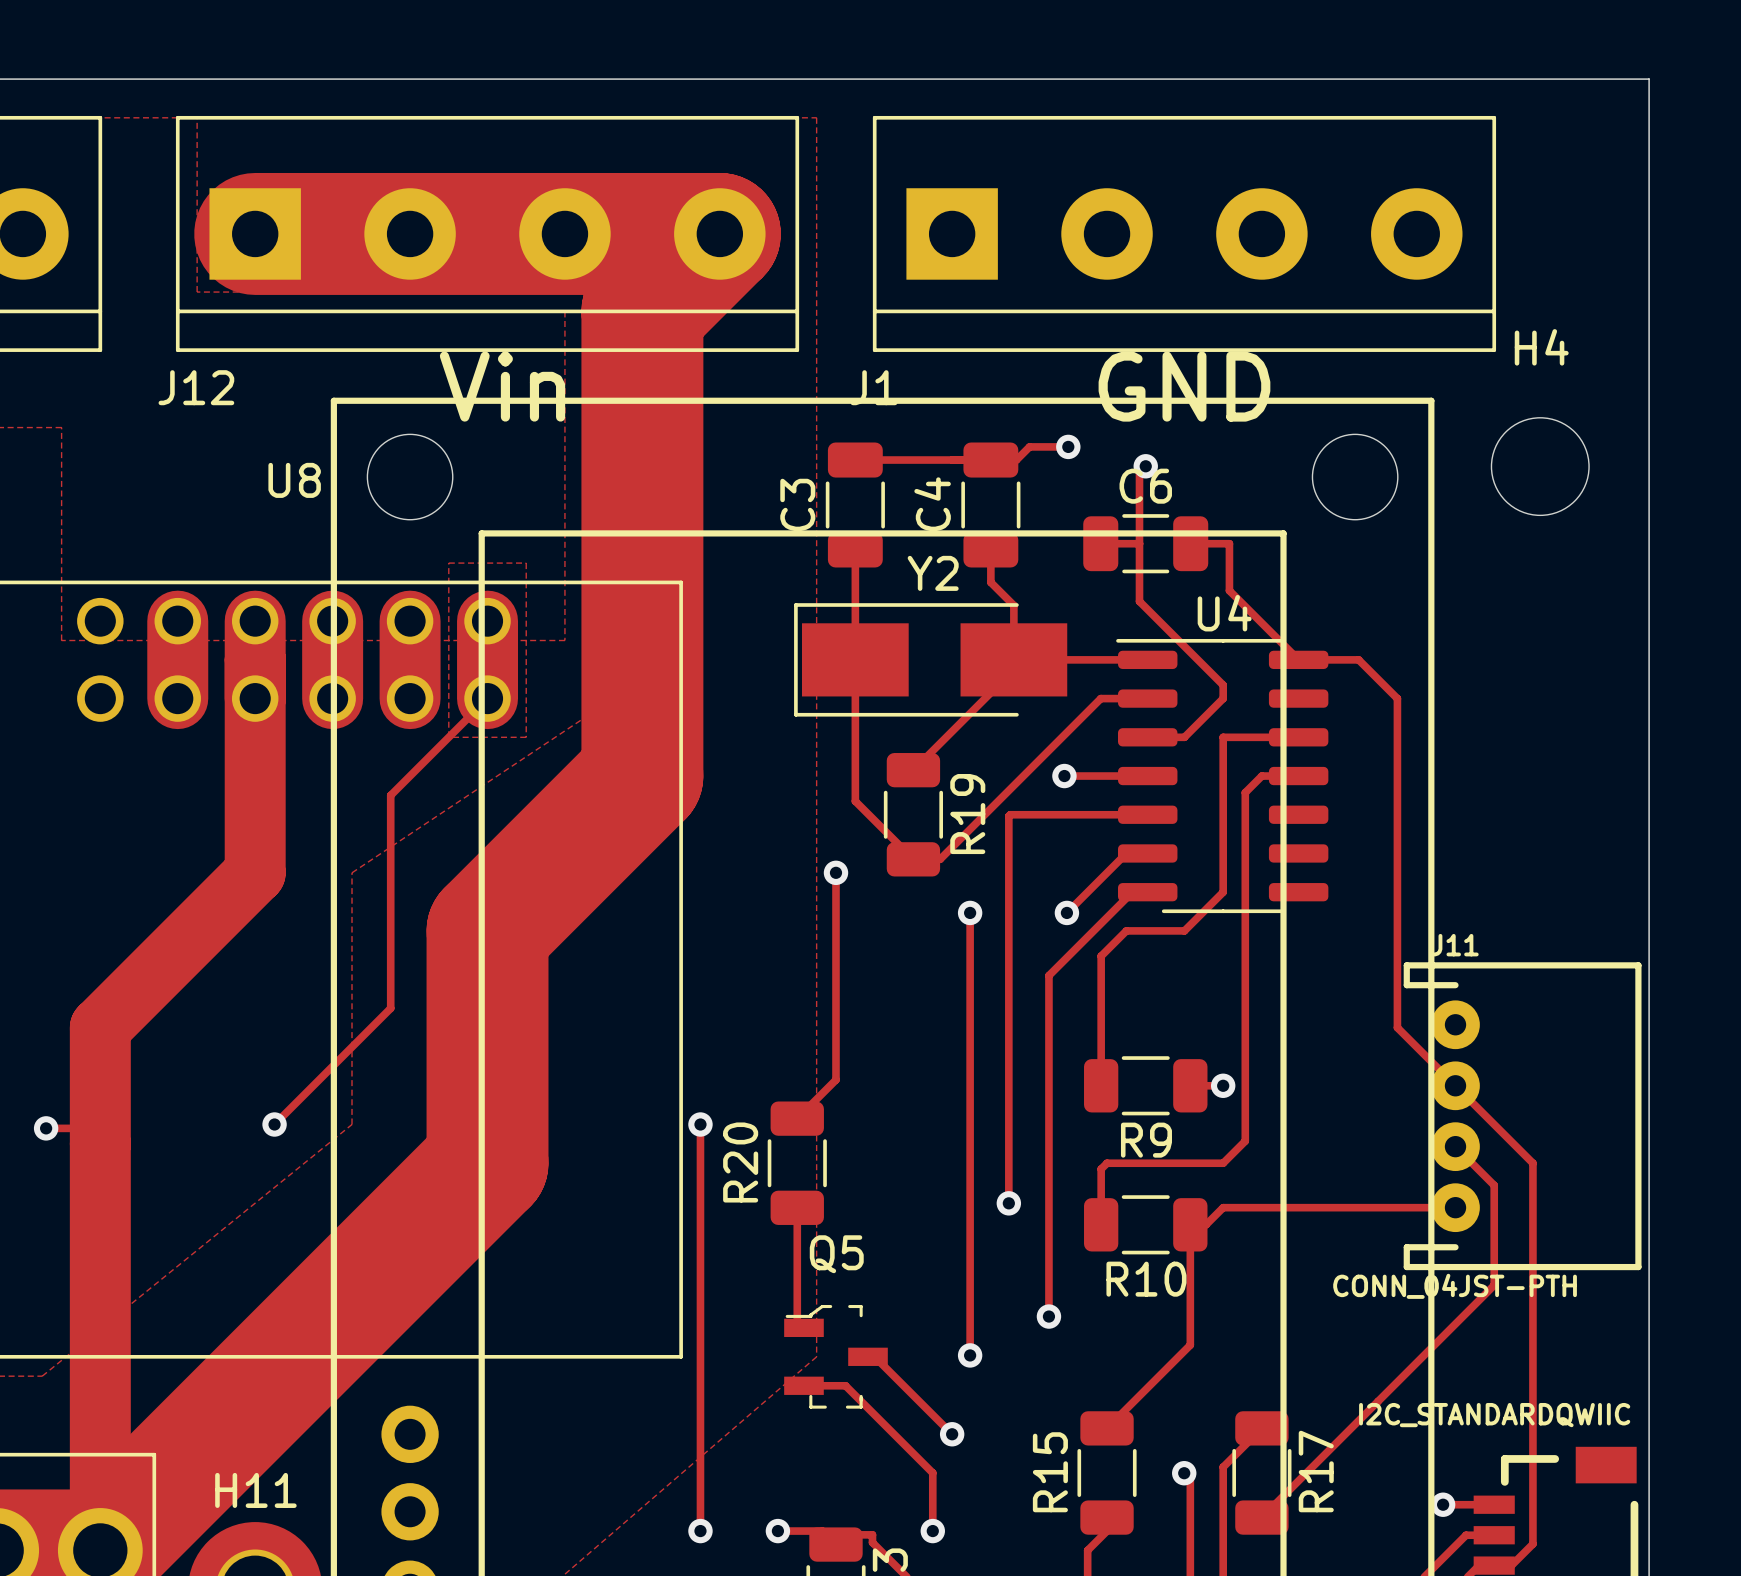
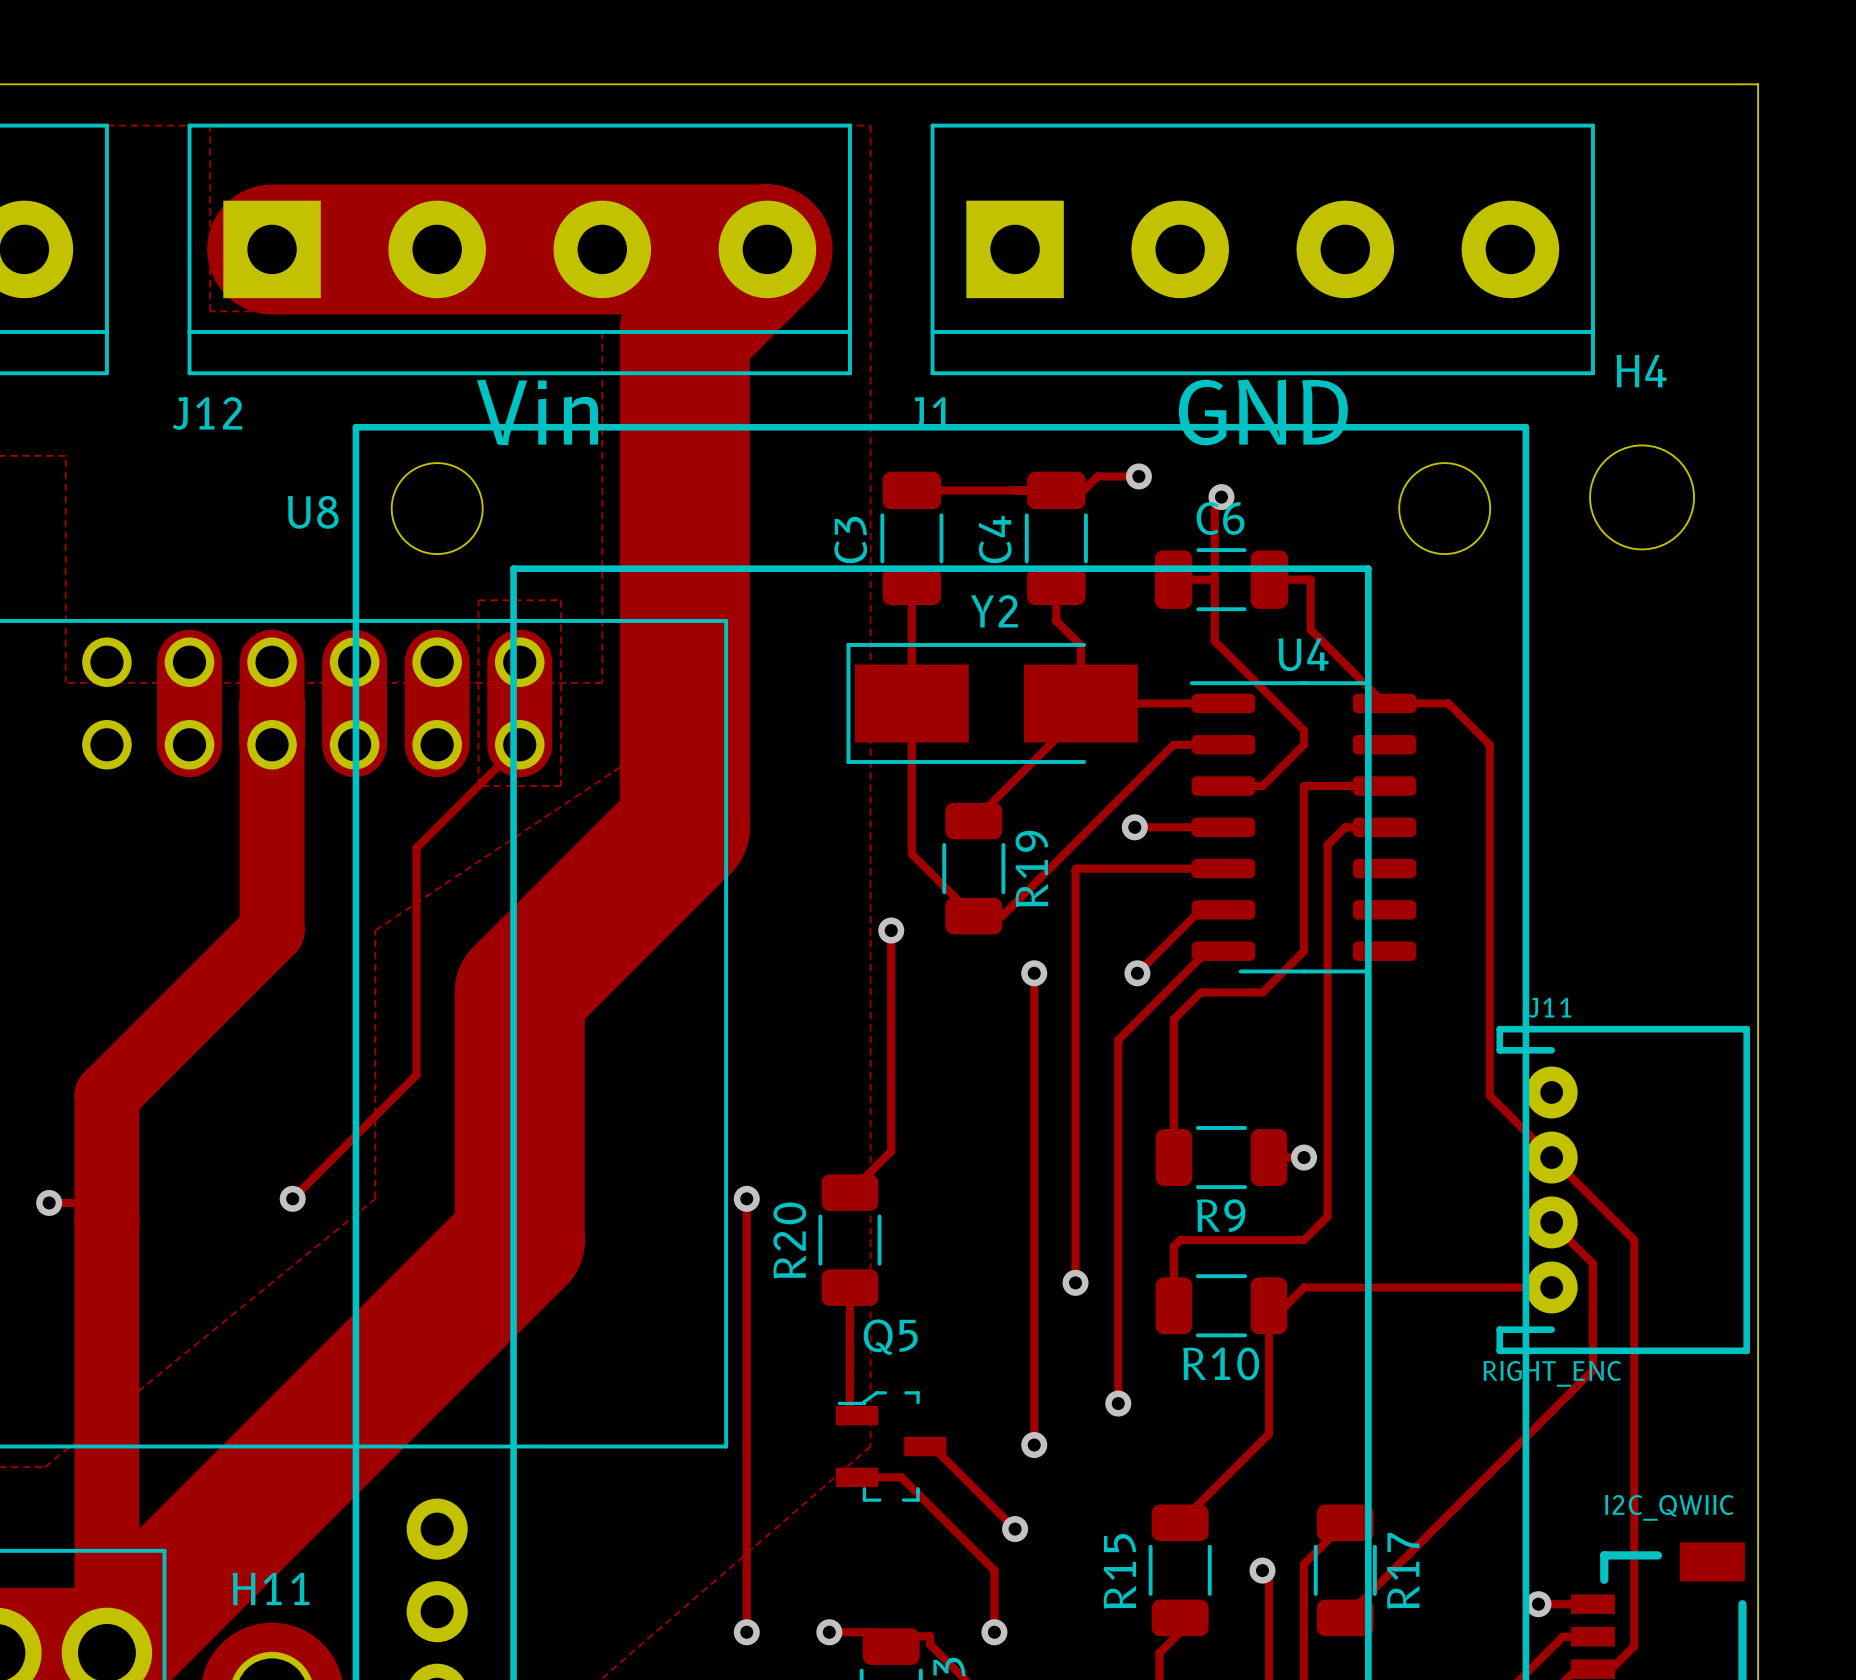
J11 value: CONN_04JST-PTH (1455, 1286) -> RIGHT_ENC (1552, 1373)
part value: I2C_STANDARDQWIIC (1494, 1415) -> I2C_QWIIC (1669, 1507)

